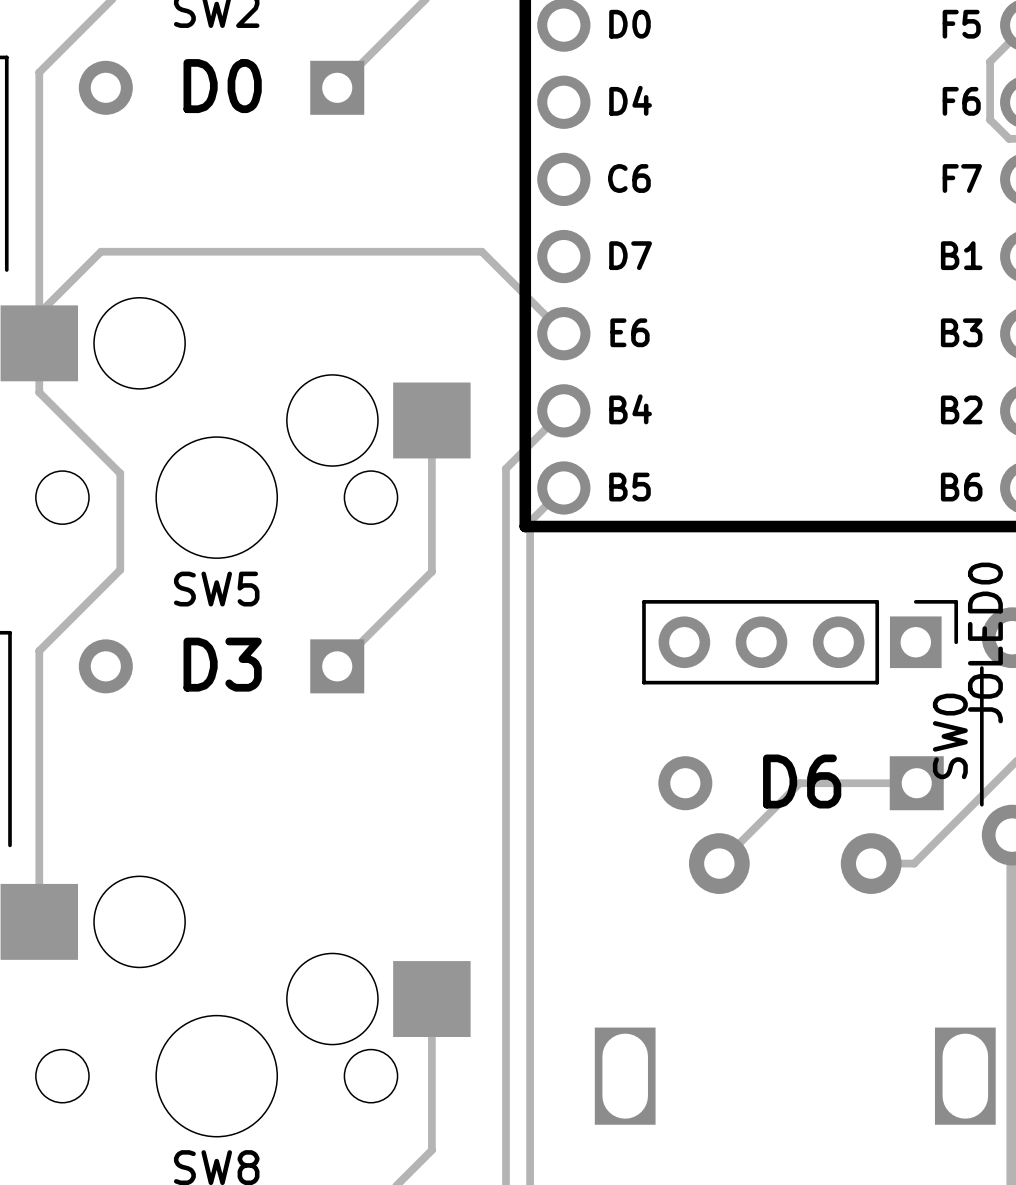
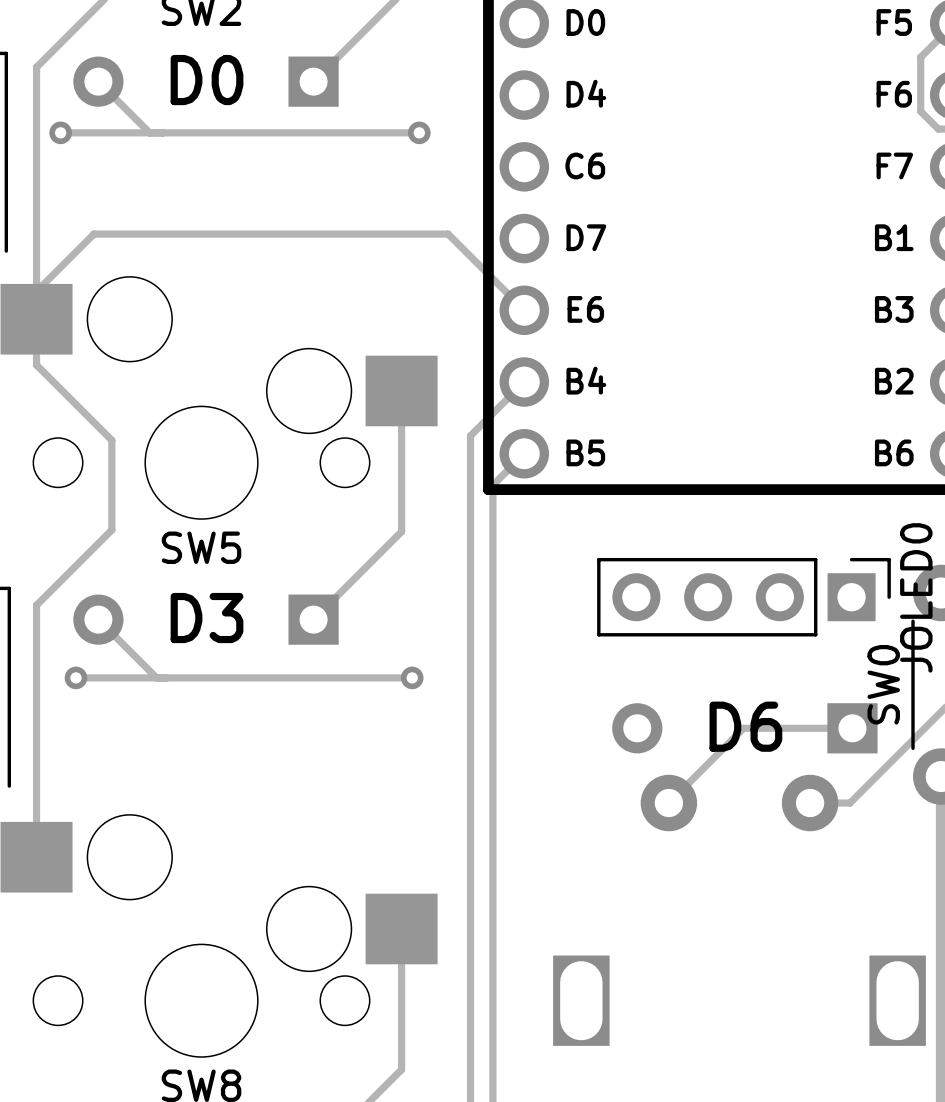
track: none -> (98, 81) (149, 132)
track: none -> (60, 132) (419, 132)
via: none -> (60, 132)
via: none -> (419, 132)
track: none -> (98, 619) (156, 677)
track: none -> (75, 677) (412, 677)
via: none -> (75, 677)
via: none -> (412, 677)

